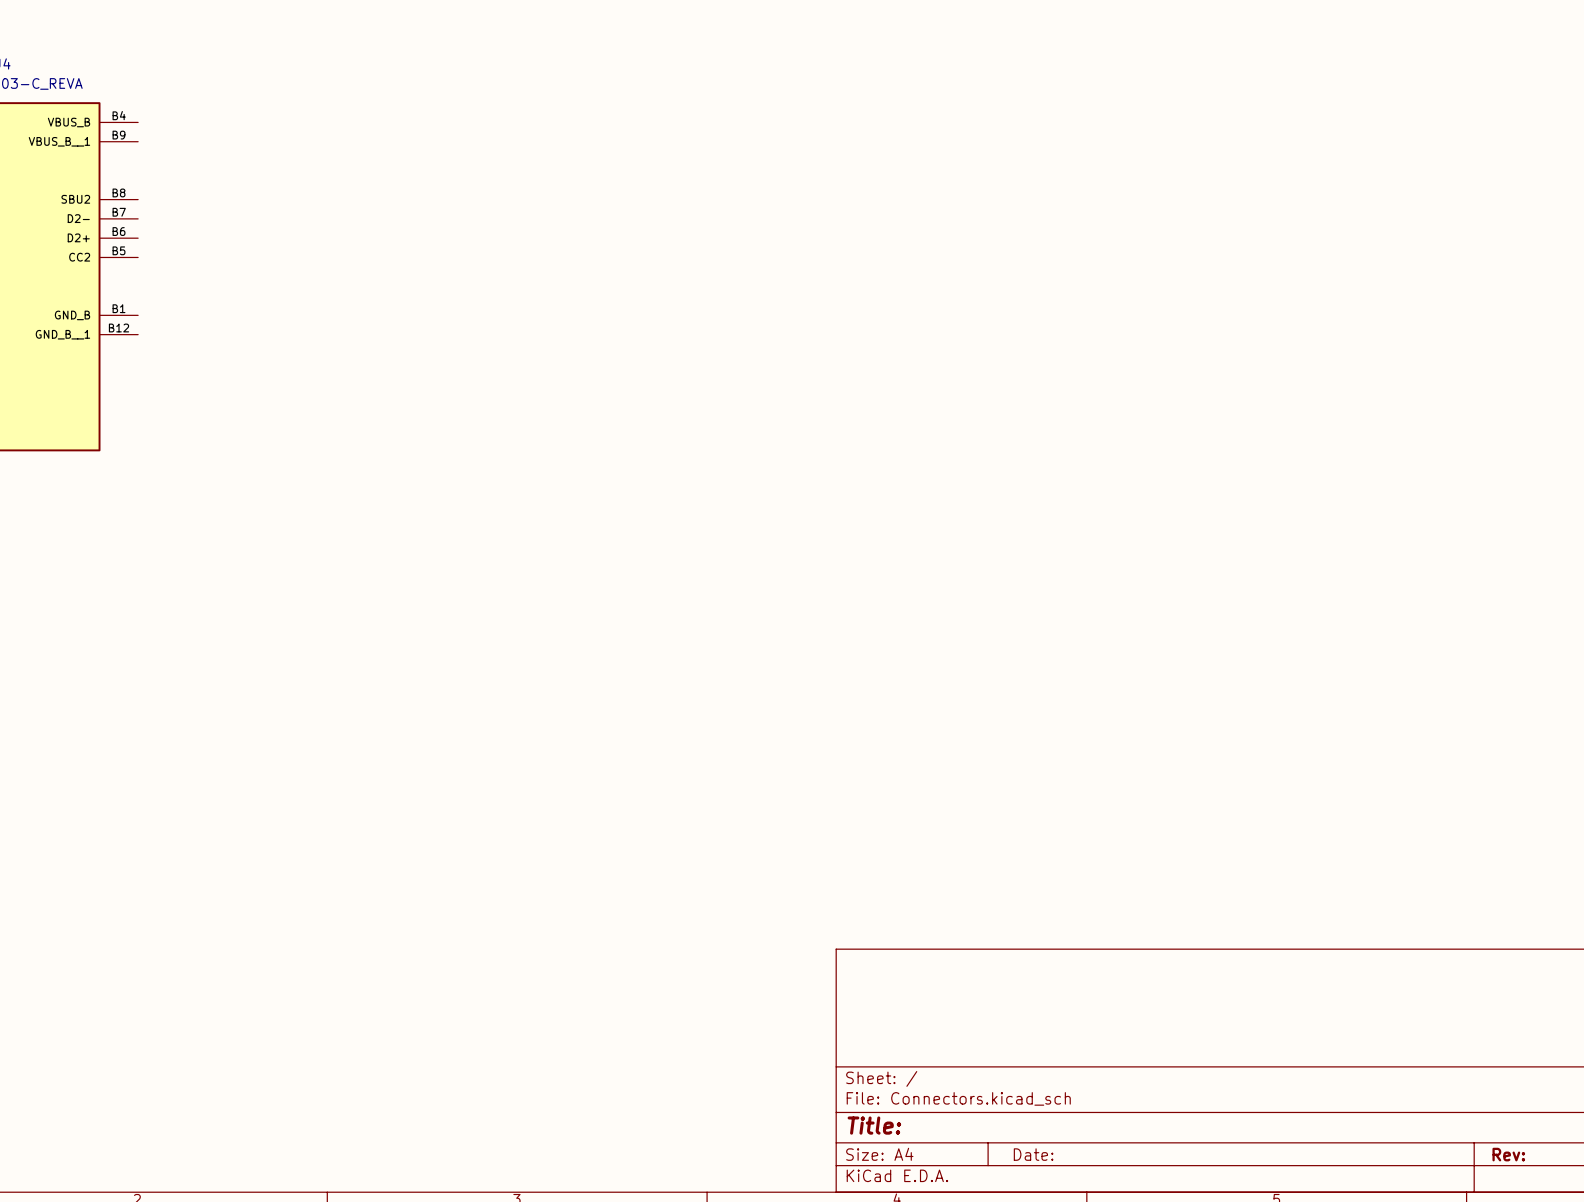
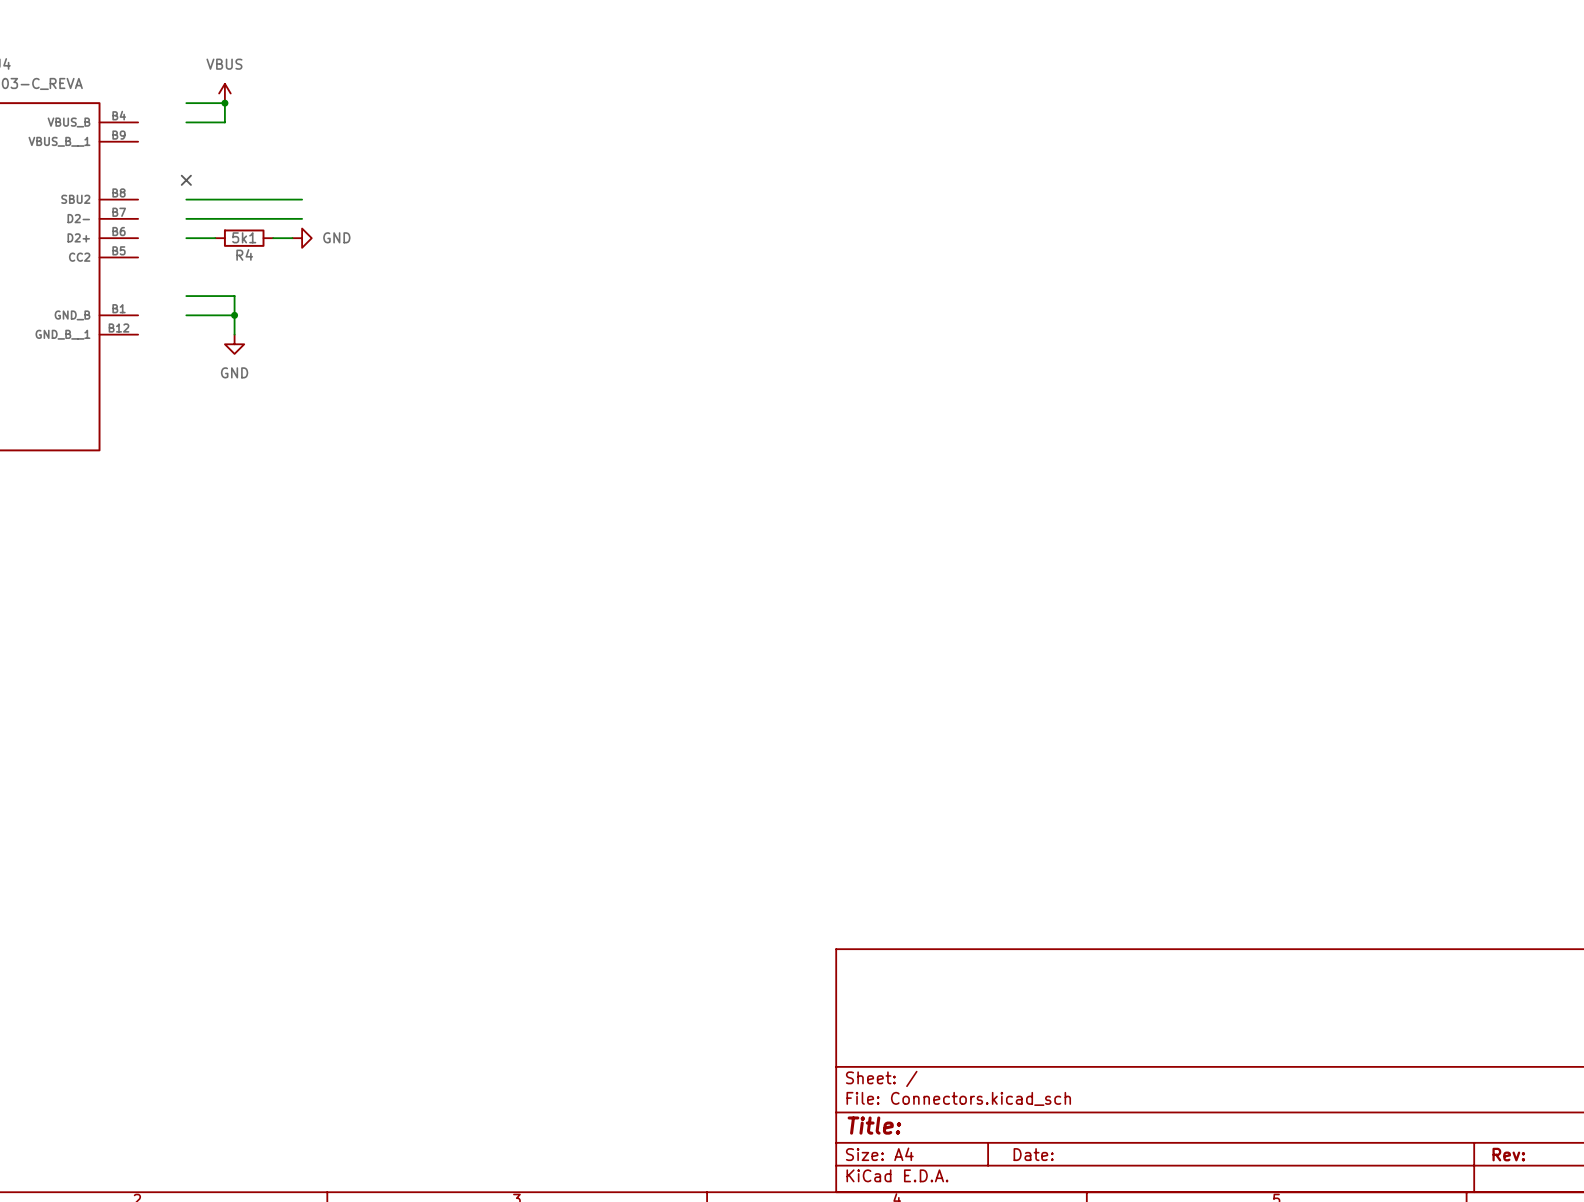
power symbol: none -> VBUS (224, 93)
wire: none -> (186, 103) (224, 103) (224, 122) (186, 122)
junction: none -> (224, 103)
no-connect mark: none -> (186, 180)
wire: none -> (186, 199) (302, 199)
wire: none -> (186, 218) (302, 218)
wire: none -> (186, 238) (215, 238)
R4: none -> 5k1 (244, 238)
wire: none -> (273, 238) (292, 238)
power symbol: none -> GND (302, 238)
wire: none -> (186, 296) (234, 296) (234, 334)
wire: none -> (186, 315) (234, 315)
junction: none -> (234, 315)
power symbol: none -> GND (234, 344)

